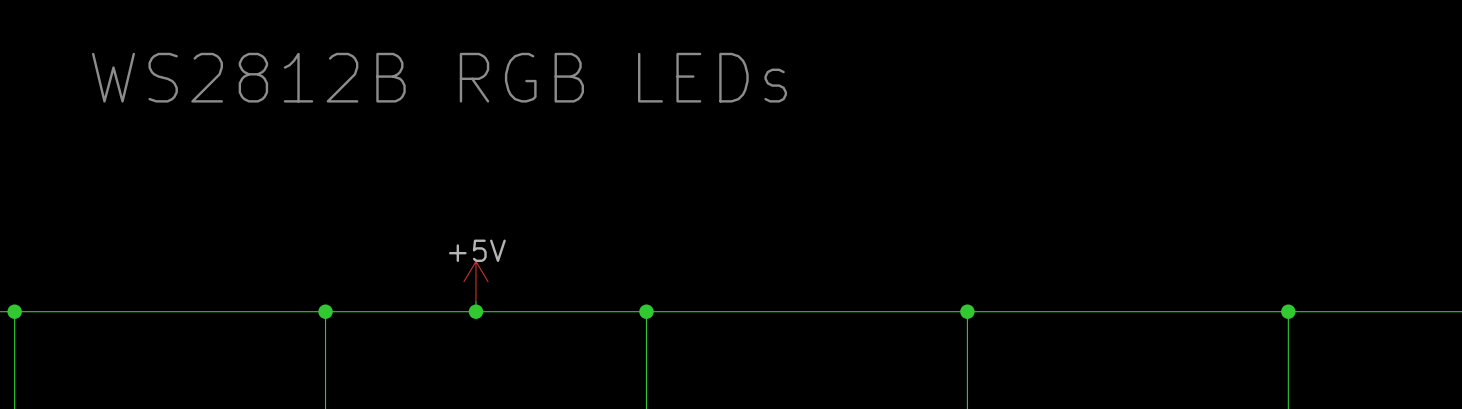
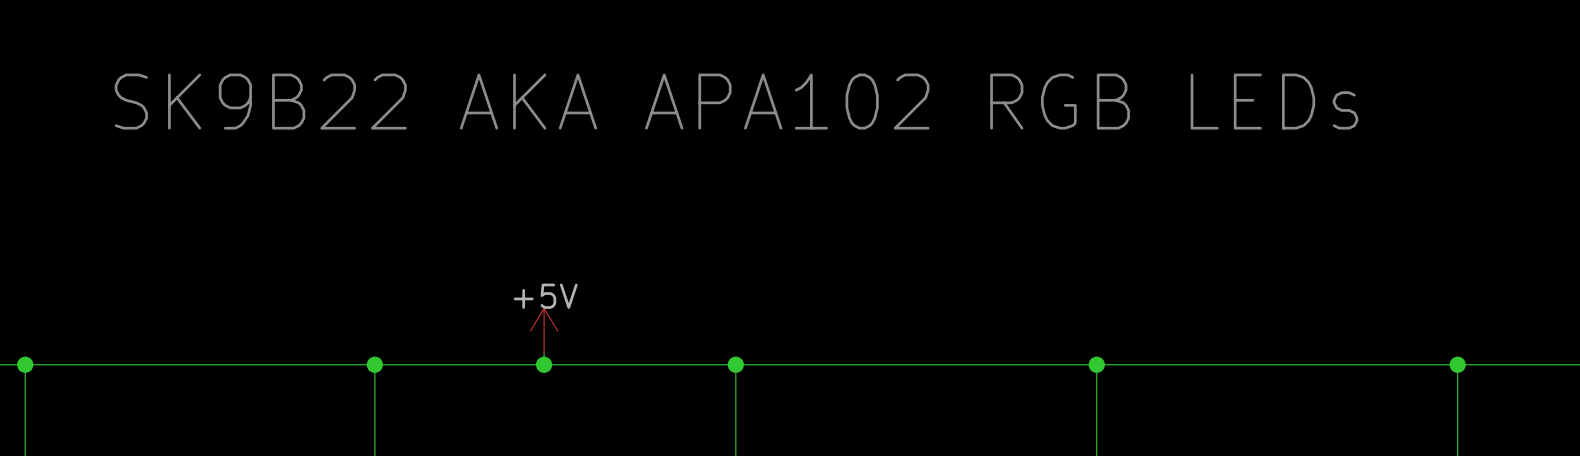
text: WS2812B RGB LEDs (439, 77) -> SK9B22 AKA APA102 RGB LEDs (736, 101)

